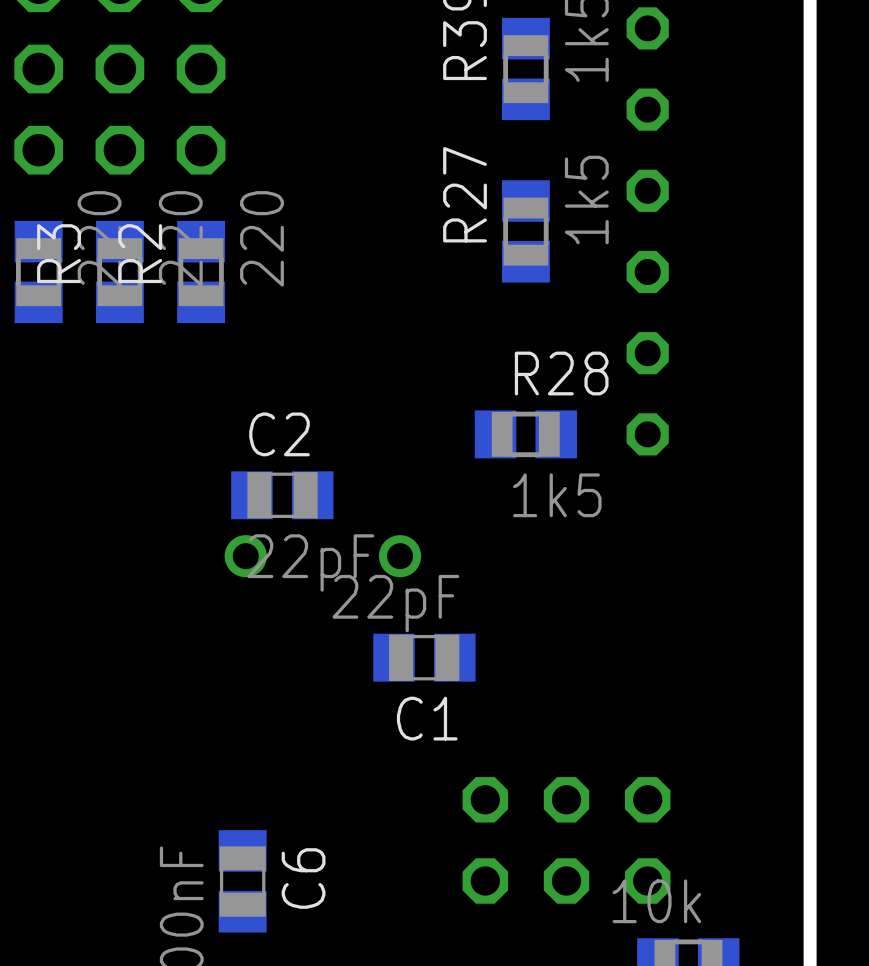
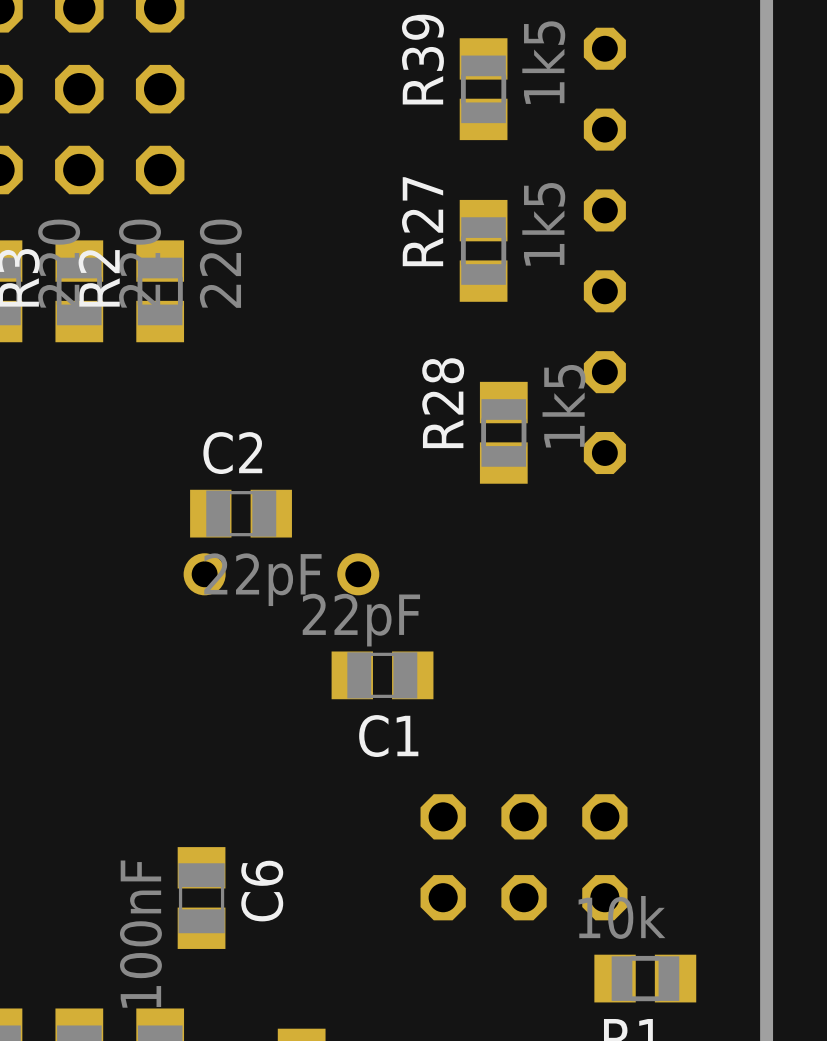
R28 name position: R28 (561, 373) -> R28 (443, 403)
R28 rotation: 0° (525, 434) -> 90° clockwise (503, 432)
R28 value position: 1k5 (557, 495) -> 1k5 (563, 406)

